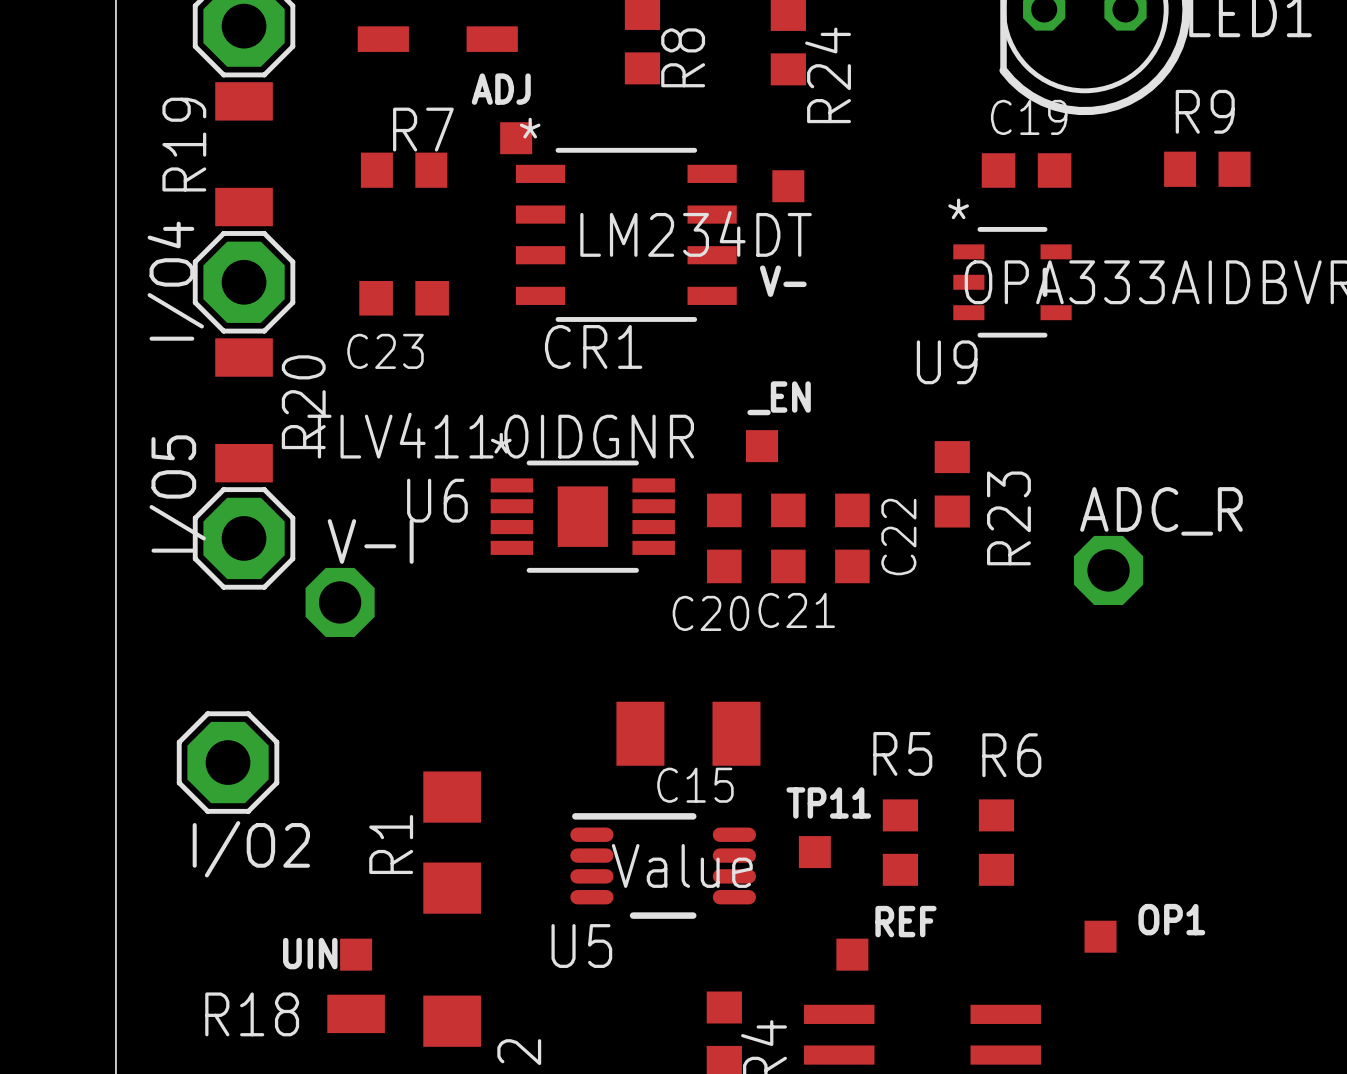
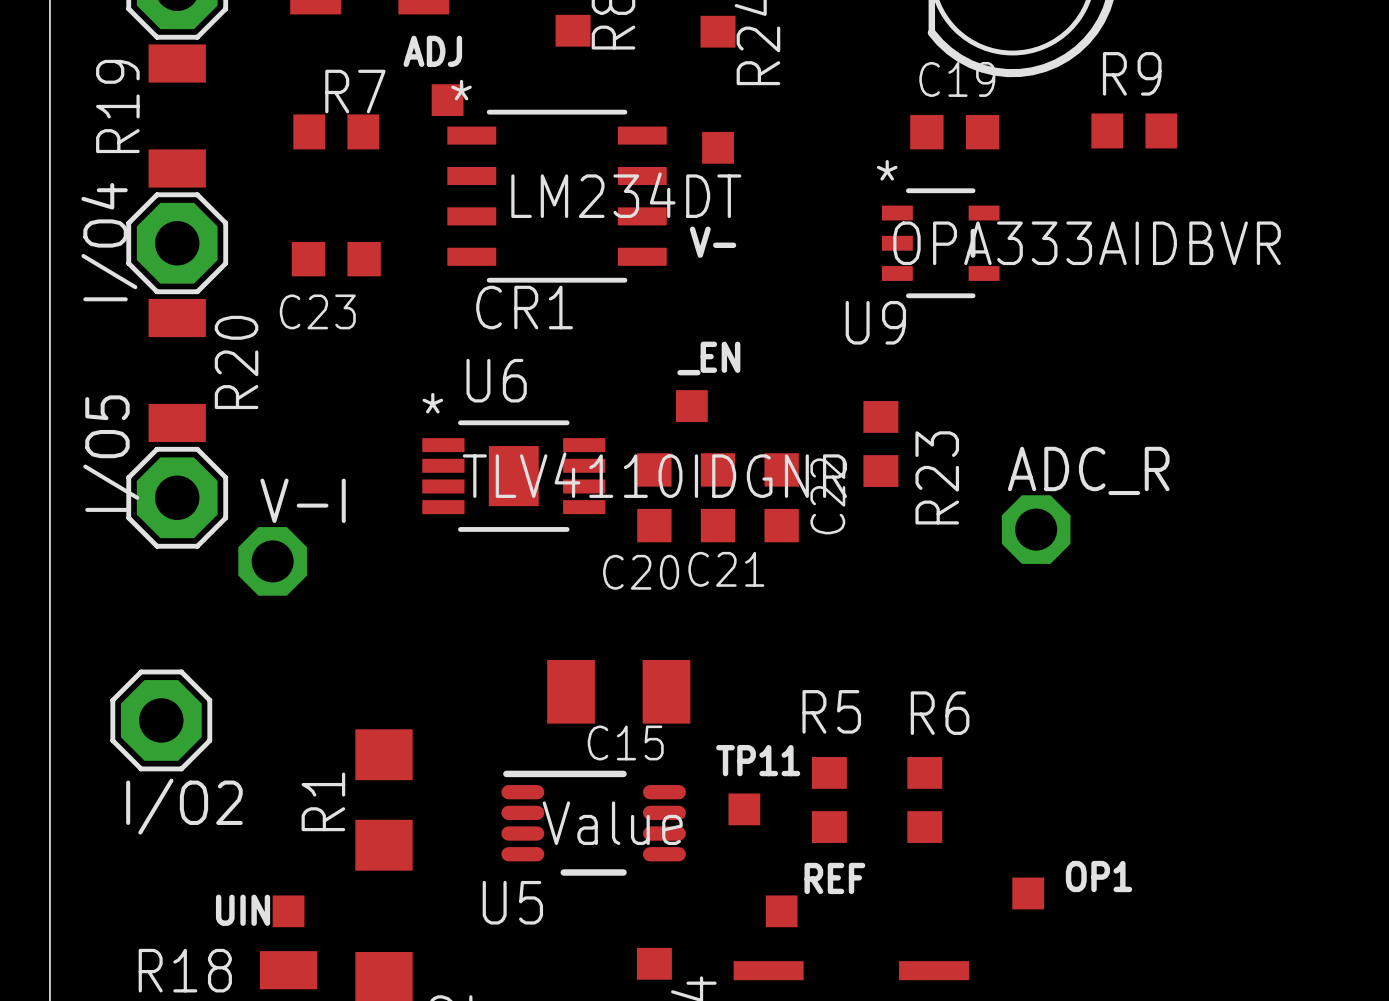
U6 value position: TLV4110IDGNR (500, 435) -> TLV4110IDGNR (654, 475)
U6 name position: U6 (437, 500) -> U6 (496, 380)

